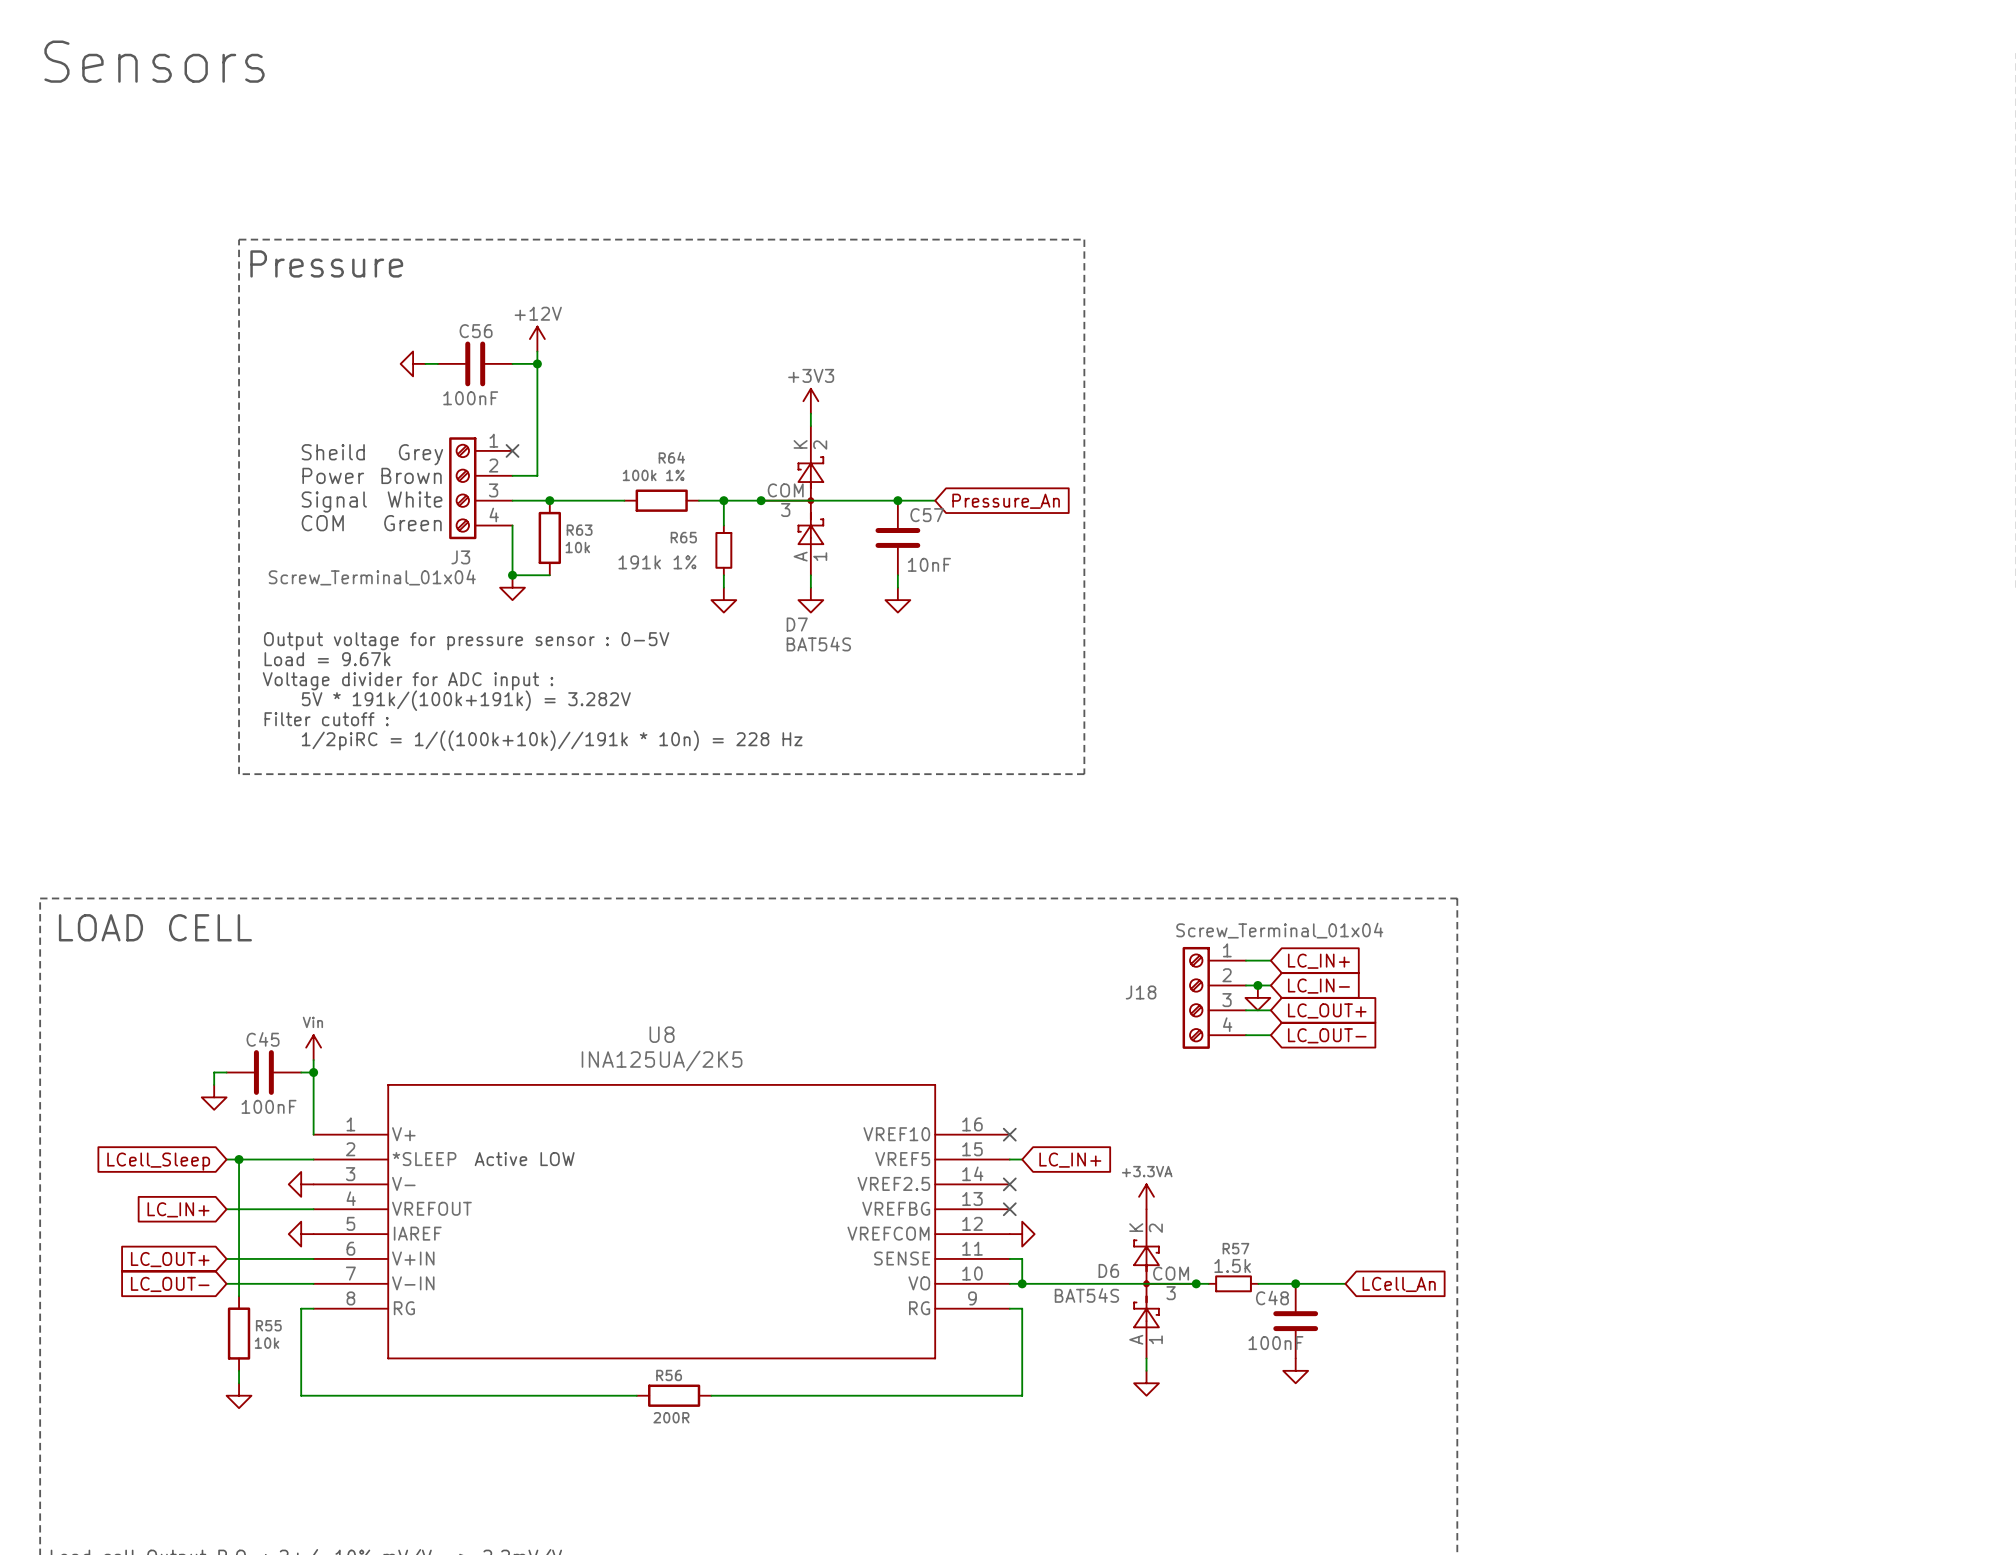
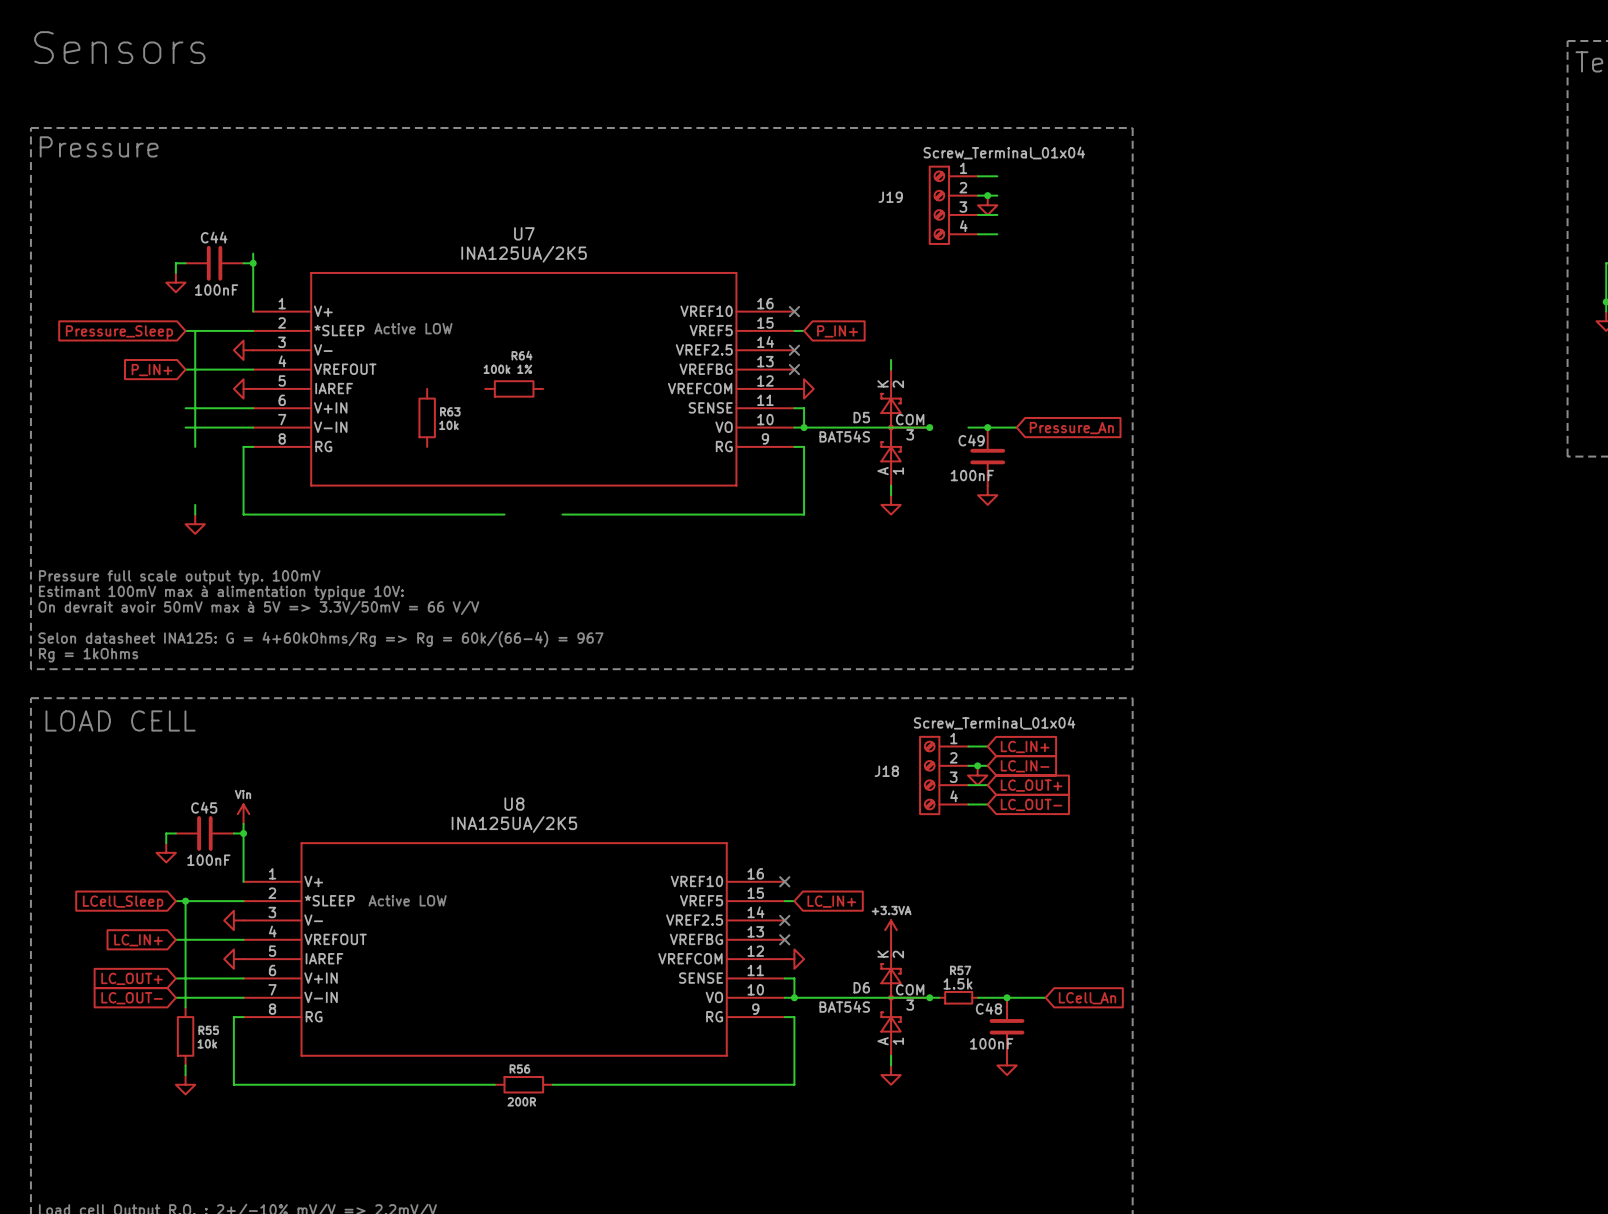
line: none -> (30, 127) (1132, 127) (1132, 669) (30, 669) (30, 127)
wire: none -> (978, 176) (997, 176)
line: (239, 239) (1084, 239) (1084, 774) (239, 774) (239, 239) -> none
wire: none -> (978, 195) (997, 195)
junction: none -> (987, 195)
text position: Pressure (326, 263) -> Pressure (99, 146)
J19: none -> Screw_Terminal_01x04 (953, 205)
power symbol: none -> (987, 205)
wire: none -> (978, 214) (997, 214)
wire: none -> (978, 234) (997, 234)
wire: none -> (253, 253) (253, 311)
wire: none -> (185, 263) (175, 263) (175, 272)
C44: none -> 100nF (214, 263)
junction: none -> (253, 263)
power symbol: +12V (537, 339) -> none
wire: (537, 351) (537, 475) (512, 475) -> none
power symbol: none -> (175, 282)
power symbol: (413, 363) -> none
wire: (425, 363) (437, 363) -> (243, 263) (253, 263)
C56: 100nF (475, 363) -> none
wire: (512, 363) (537, 363) -> none
junction: (537, 363) -> none
power symbol: +3V3 (810, 401) -> none
no-connect mark: none -> (794, 311)
wire: (810, 413) (810, 426) -> none
text: none -> Active LOW (413, 328)
wire: none -> (185, 330) (253, 330)
wire: none -> (195, 330) (195, 446)
wire: none -> (794, 330) (804, 330)
global label: none -> P_IN+ (837, 331)
global label: none -> Pressure_Sleep (119, 332)
power symbol: none -> (243, 350)
no-connect mark: (512, 450) -> none
no-connect mark: none -> (794, 350)
text: Sheild (333, 452) -> none
text: Grey (420, 454) -> none
wire: none -> (891, 359) (891, 369)
wire: none -> (185, 369) (253, 369)
text: Power (333, 475) -> none
text: Brown (411, 475) -> none
no-connect mark: none -> (794, 369)
global label: none -> P_IN+ (152, 370)
J3: Screw_Terminal_01x04 (480, 488) -> none
U7: none -> INA125UA/2K5 (523, 379)
text: White (415, 499) -> none
power symbol: none -> (243, 388)
wire: (512, 500) (624, 500) -> none
junction: (549, 500) -> none
wire: (698, 500) (935, 500) -> none
wire: (723, 500) (723, 525) -> none
junction: (723, 500) -> none
junction: (761, 500) -> none
D7: BAT54S (792, 500) -> none
junction: (897, 500) -> none
power symbol: none -> (804, 388)
text: Signal (334, 501) -> none
global label: Pressure_An (1006, 501) -> none
text: COM (322, 523) -> none
text: Green (412, 523) -> none
wire: none -> (185, 408) (253, 408)
wire: (512, 525) (512, 575) (549, 575) -> none
wire: none -> (794, 408) (804, 408) (804, 427)
C57: 10nF (897, 537) -> none
wire: none -> (185, 427) (253, 427)
R65: 191k 1% (723, 550) -> none
wire: none -> (794, 427) (929, 427)
junction: none -> (804, 427)
D5: none -> BAT54S (905, 427)
junction: none -> (929, 427)
wire: none -> (968, 427) (1016, 427)
junction: none -> (987, 427)
global label: none -> Pressure_An (1071, 428)
wire: none -> (253, 446) (243, 446) (243, 514) (504, 514)
junction: (512, 575) -> none
wire: (723, 575) (723, 587) -> none
wire: (810, 575) (810, 587) -> none
wire: (897, 575) (897, 587) -> none
wire: none -> (794, 446) (804, 446) (804, 514) (562, 514)
power symbol: (512, 587) -> none
C49: none -> 100nF (987, 456)
power symbol: (723, 600) -> none
power symbol: (810, 600) -> none
power symbol: (897, 600) -> none
wire: none -> (891, 485) (891, 495)
power symbol: none -> (987, 495)
text: Output voltage for pressure sensor : 0-5V (466, 641) -> none
wire: none -> (195, 504) (195, 514)
power symbol: none -> (891, 504)
text: Load = 9.67k (327, 659) -> none
power symbol: none -> (195, 524)
text: Voltage divider for ADC input : (408, 681) -> none
text: 5V * 191k/(100k+191k) = 3.282V (466, 700) -> none
text: Filter cutoff : (326, 719) -> none
text: 1/2piRC = 1/((100k+10k)//191k * 10n) = 228 Hz (552, 740) -> none
text: none -> Pressure full scale output typ. 100mV (179, 577)
text: none -> Estimant 100mV max à alimentation typique 10V: (221, 592)
text: none -> On devrait avoir 50mV max à 5V => 3.3V/50mV = 66 V/V (258, 607)
text: none -> Selon datasheet INA125: G = 4+60kOhms/Rg => Rg = 60k/(66-4) = 967 (320, 639)
text: none -> Rg = 1kOhms (88, 655)

